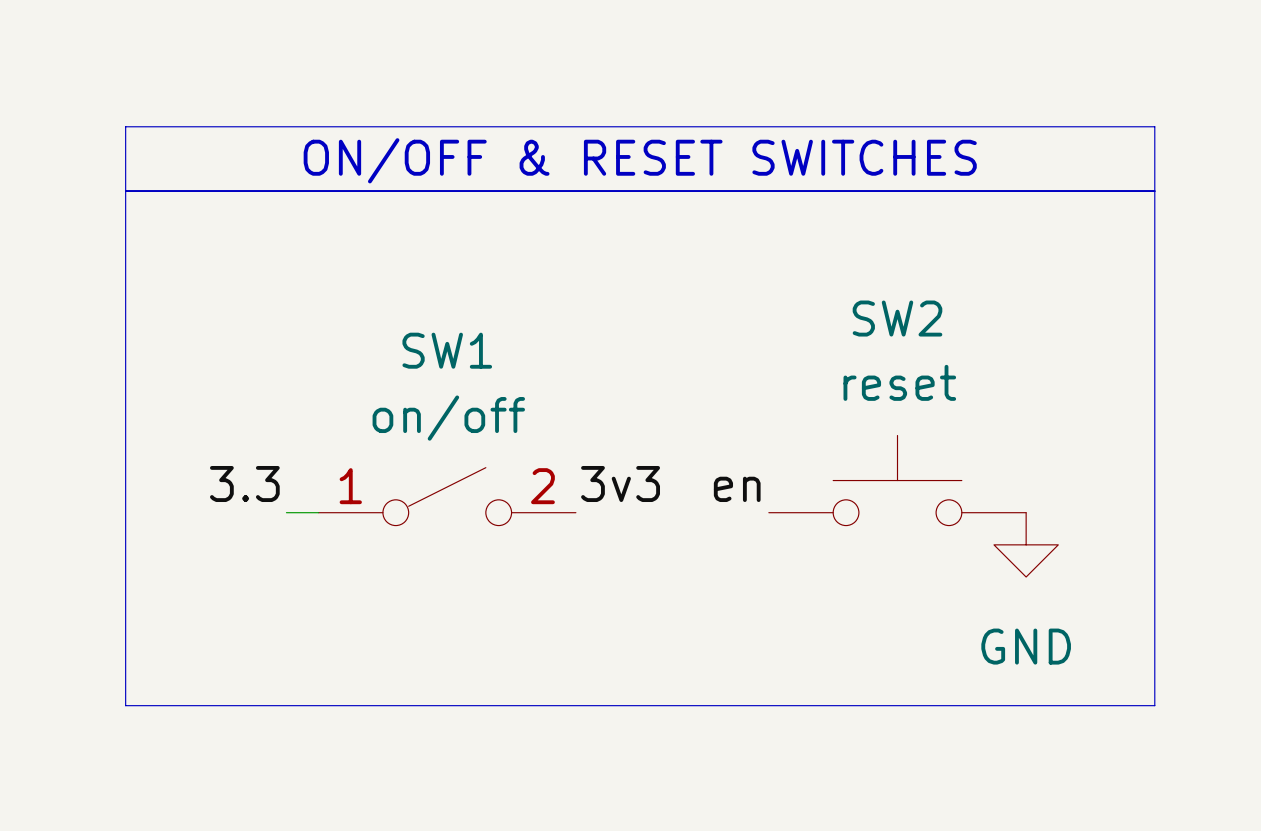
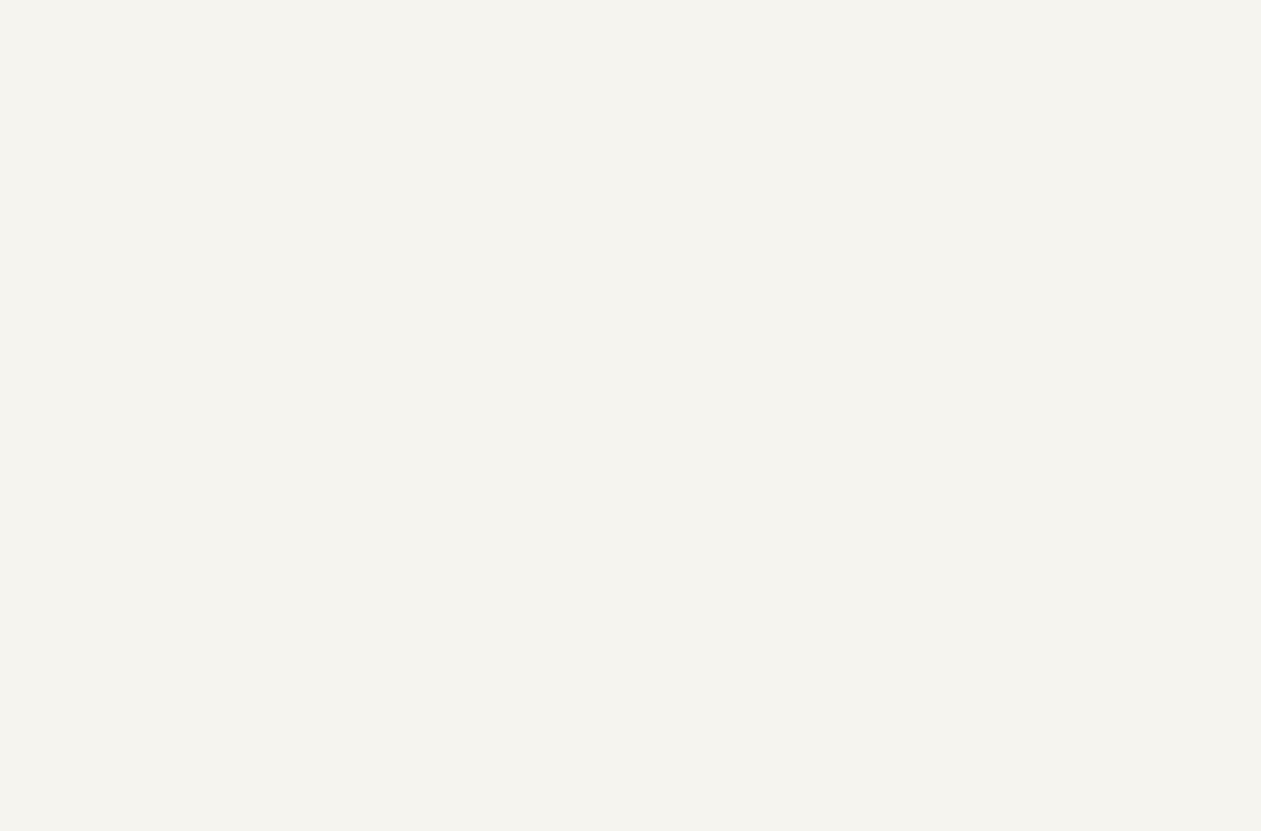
line: (125, 126) (125, 705) (1154, 705) (1154, 126) (125, 126) -> none
text: ON/OFF & RESET SWITCHES (640, 160) -> none
line: (125, 191) (1154, 191) -> none
SW2: reset (897, 480) -> none
label: 3.3 (244, 484) -> none
label: 3v3 (620, 484) -> none
label: en (737, 489) -> none
SW1: on/off (447, 496) -> none
wire: (286, 512) (318, 512) -> none
power symbol: GND (1026, 544) -> none

